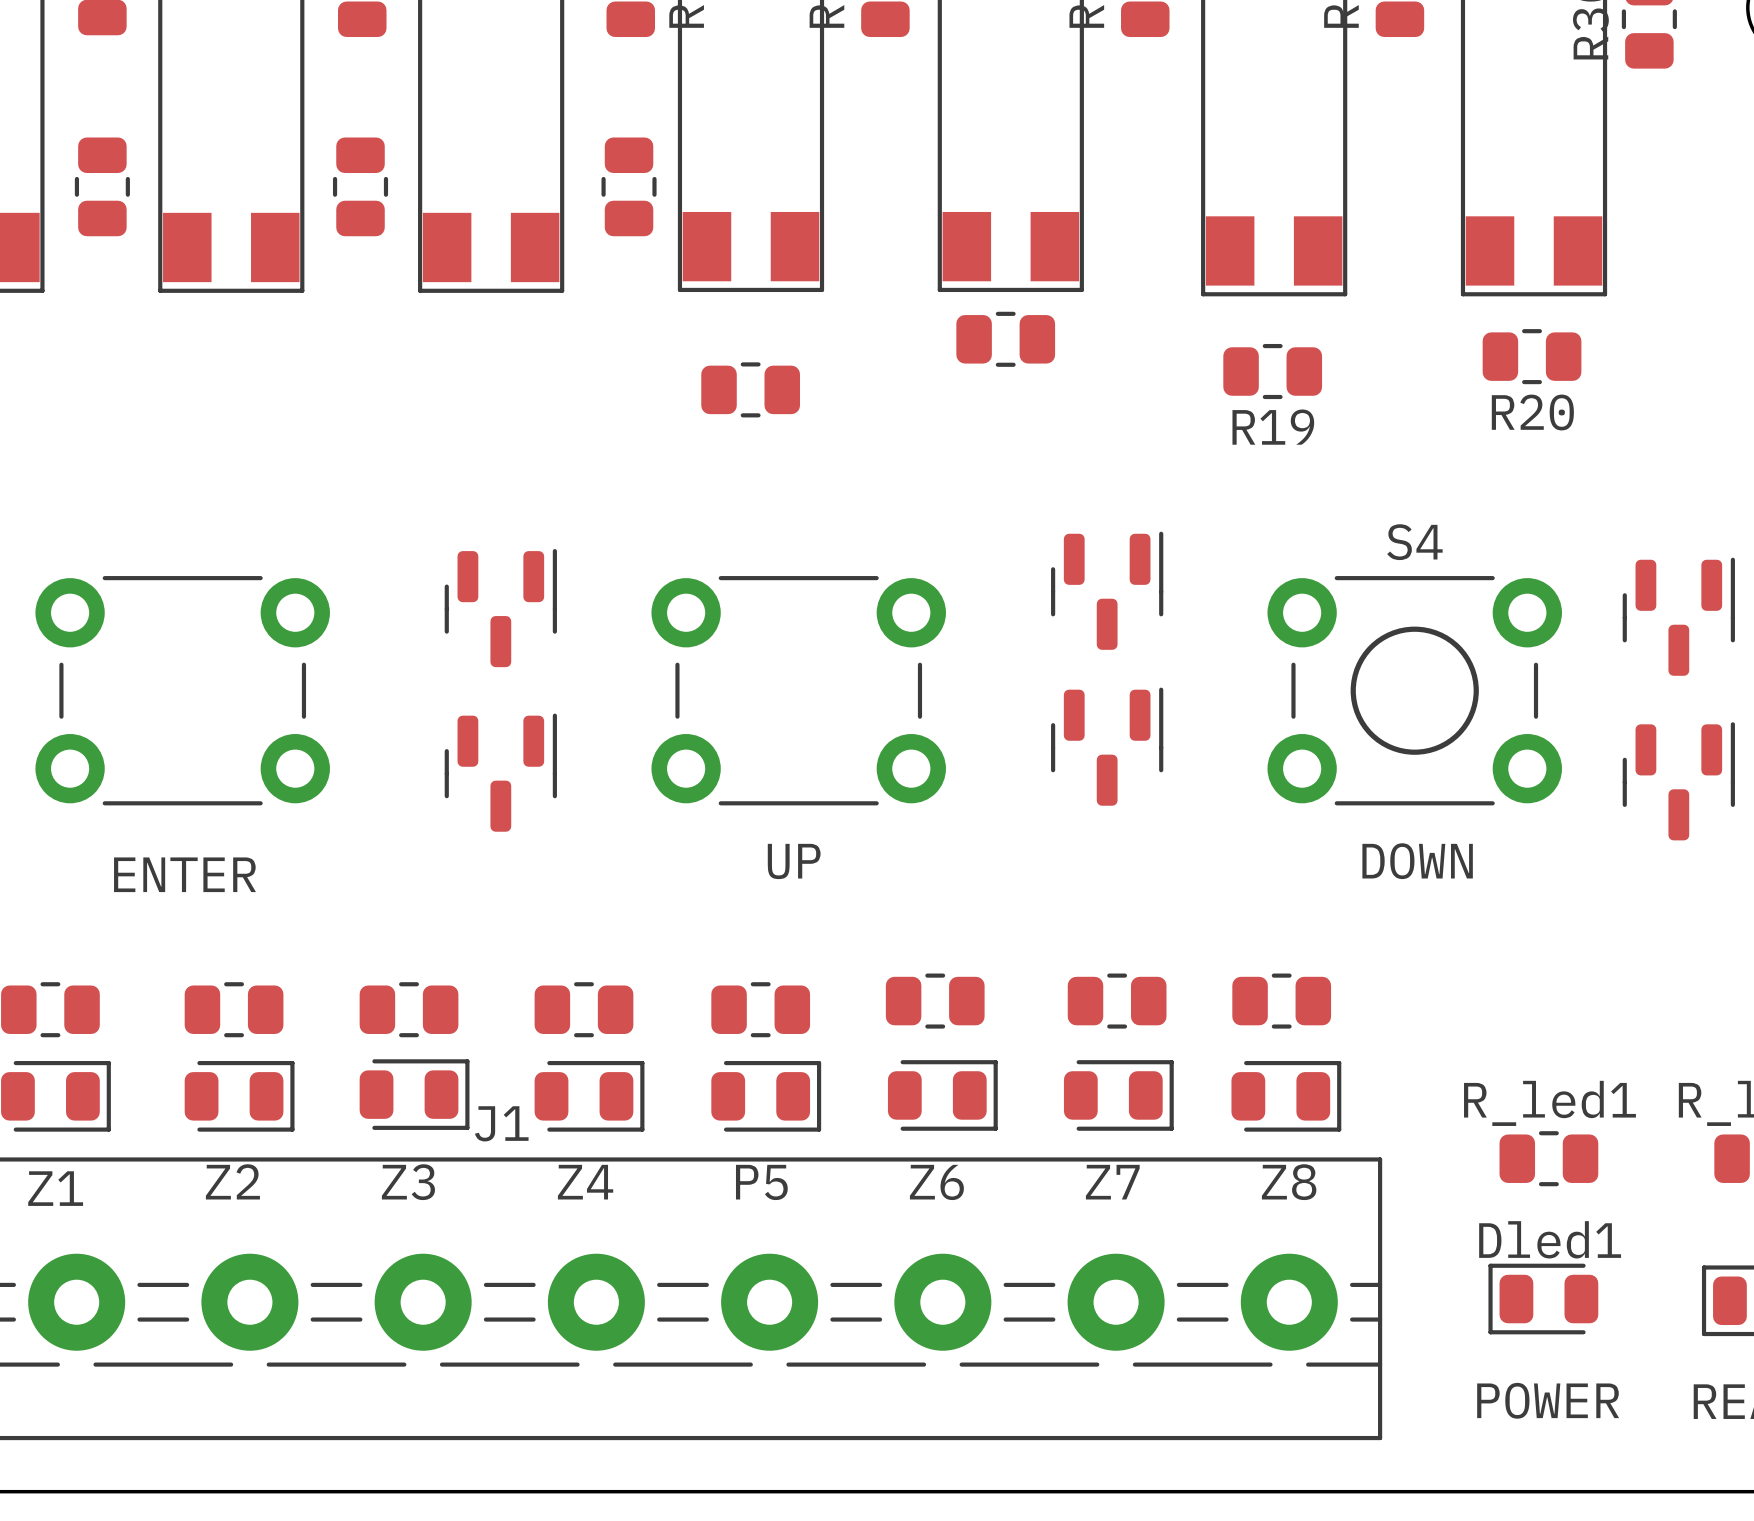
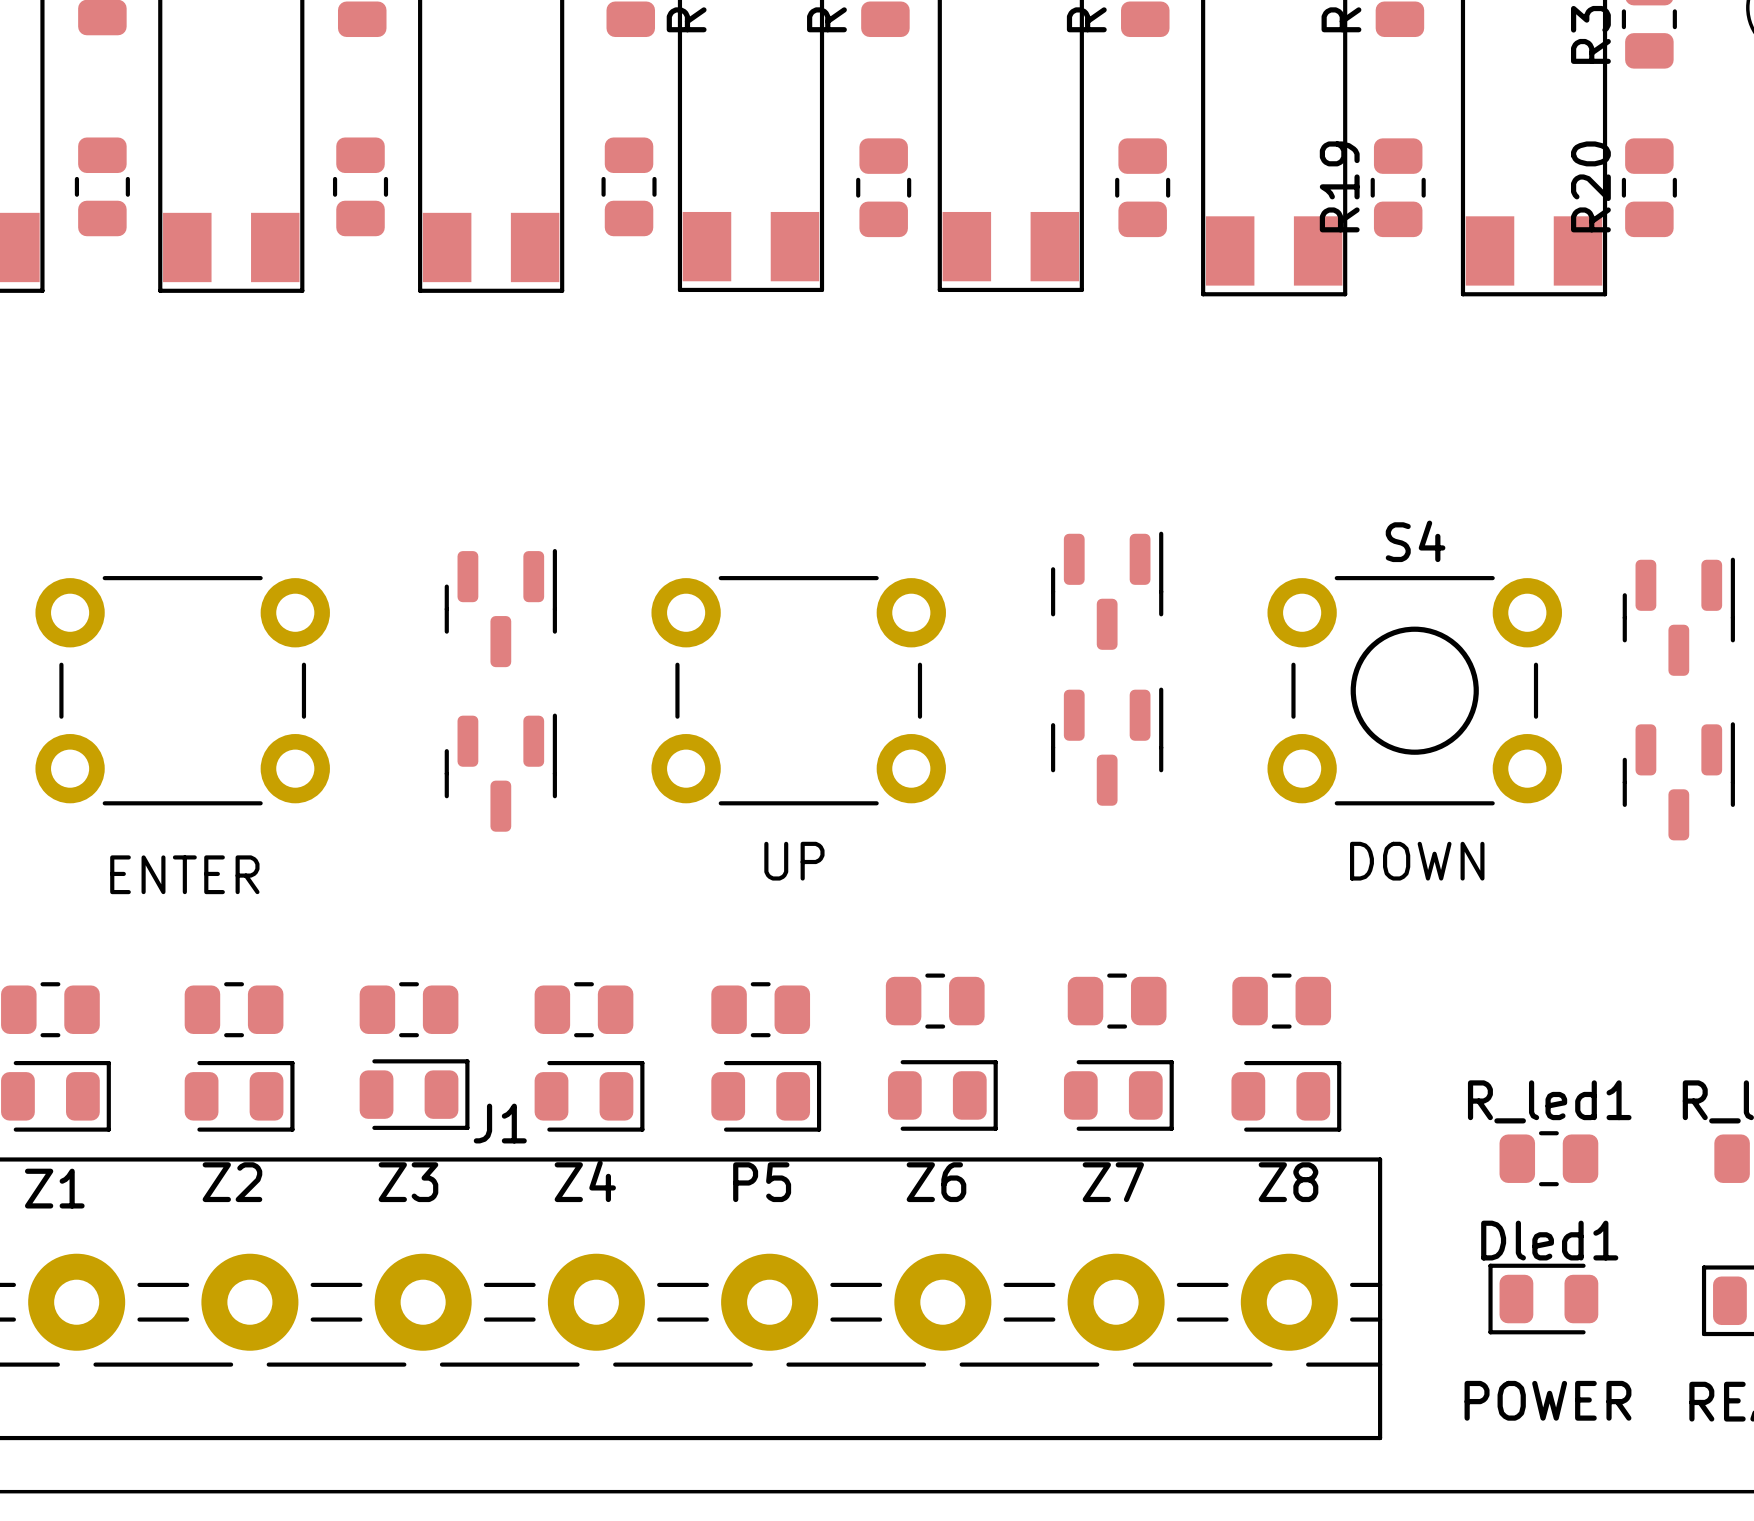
part: none -> (883, 187)
part: none -> (1142, 187)
part: (1005, 339) -> none
R20 rotation: 0° (1532, 356) -> 90° clockwise (1649, 187)
R20 position: (1532, 356) -> (1649, 187)
R19 rotation: 0° (1272, 371) -> 90° clockwise (1398, 187)
R19 position: (1272, 371) -> (1398, 187)
part: (750, 389) -> none

